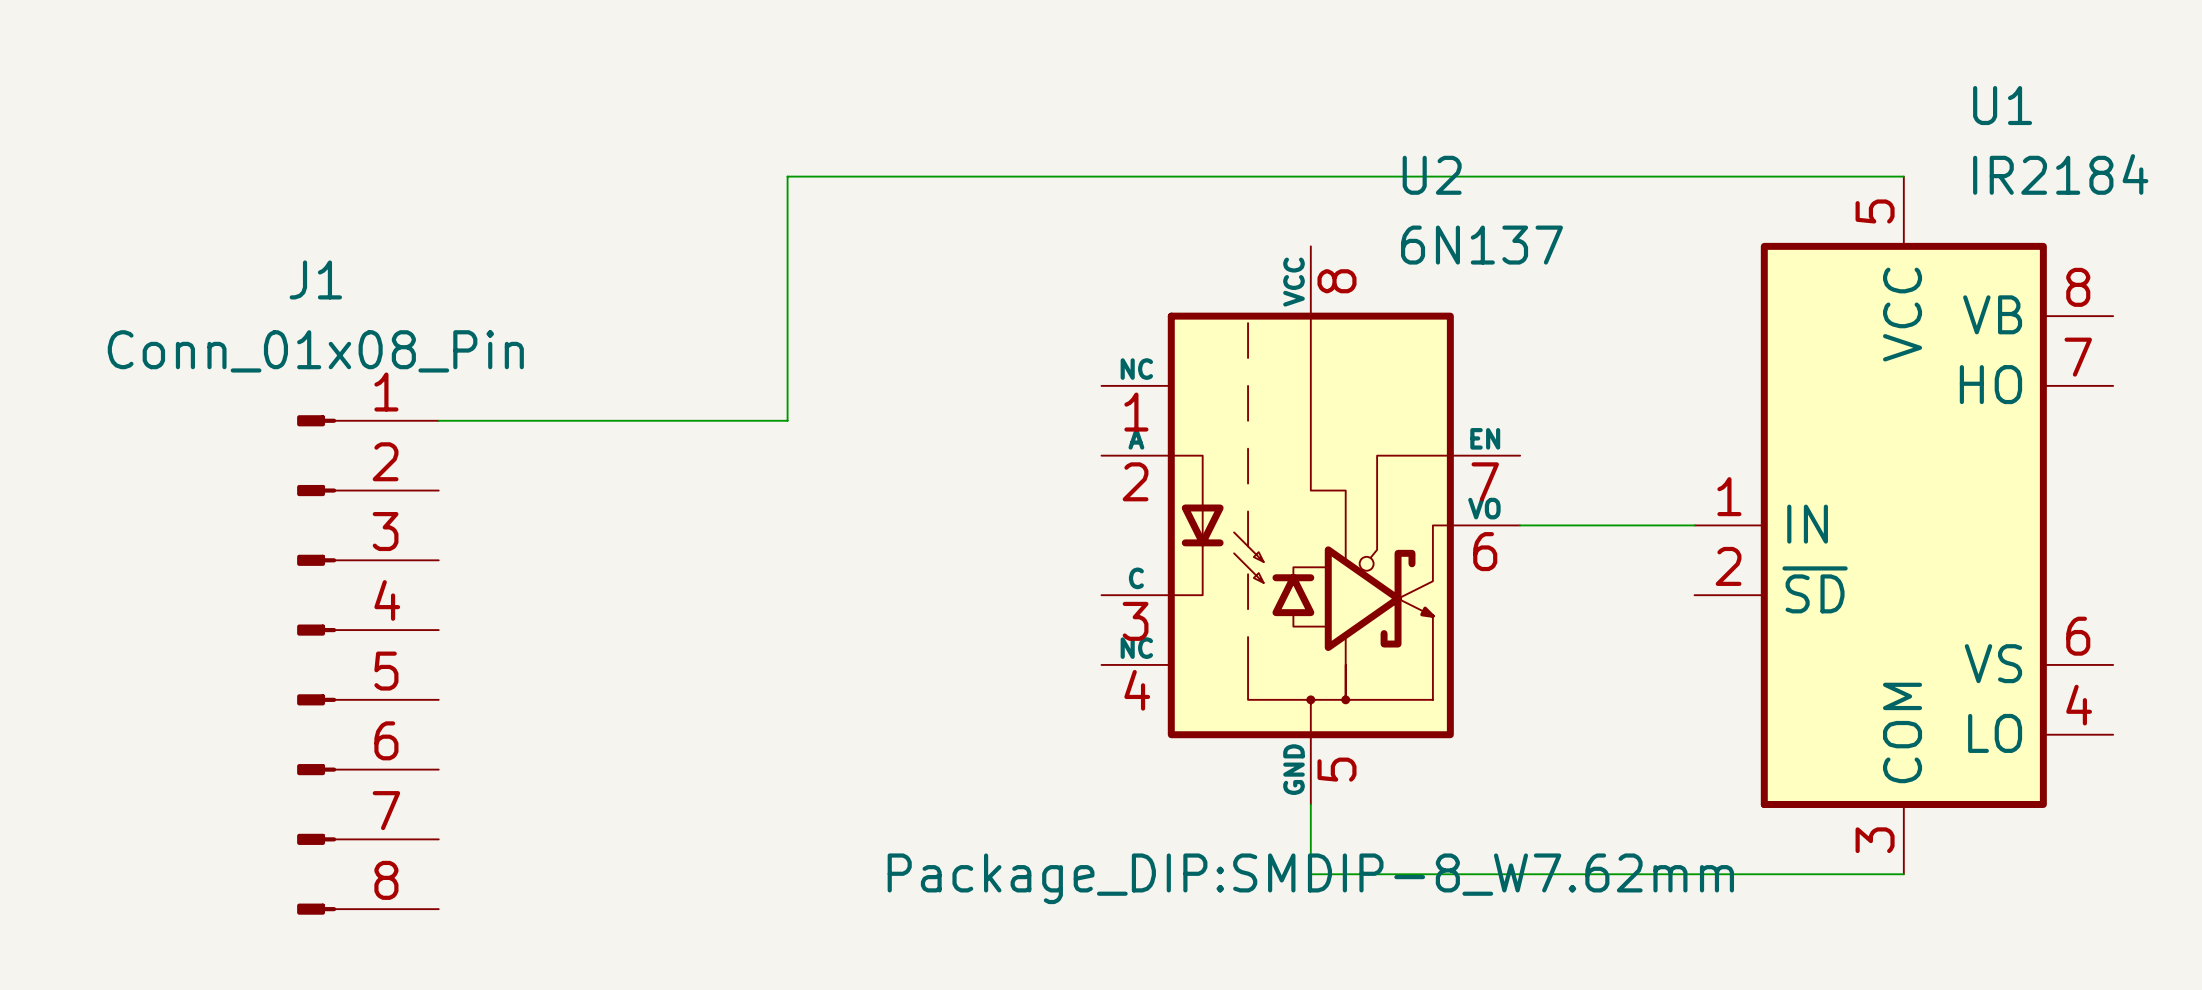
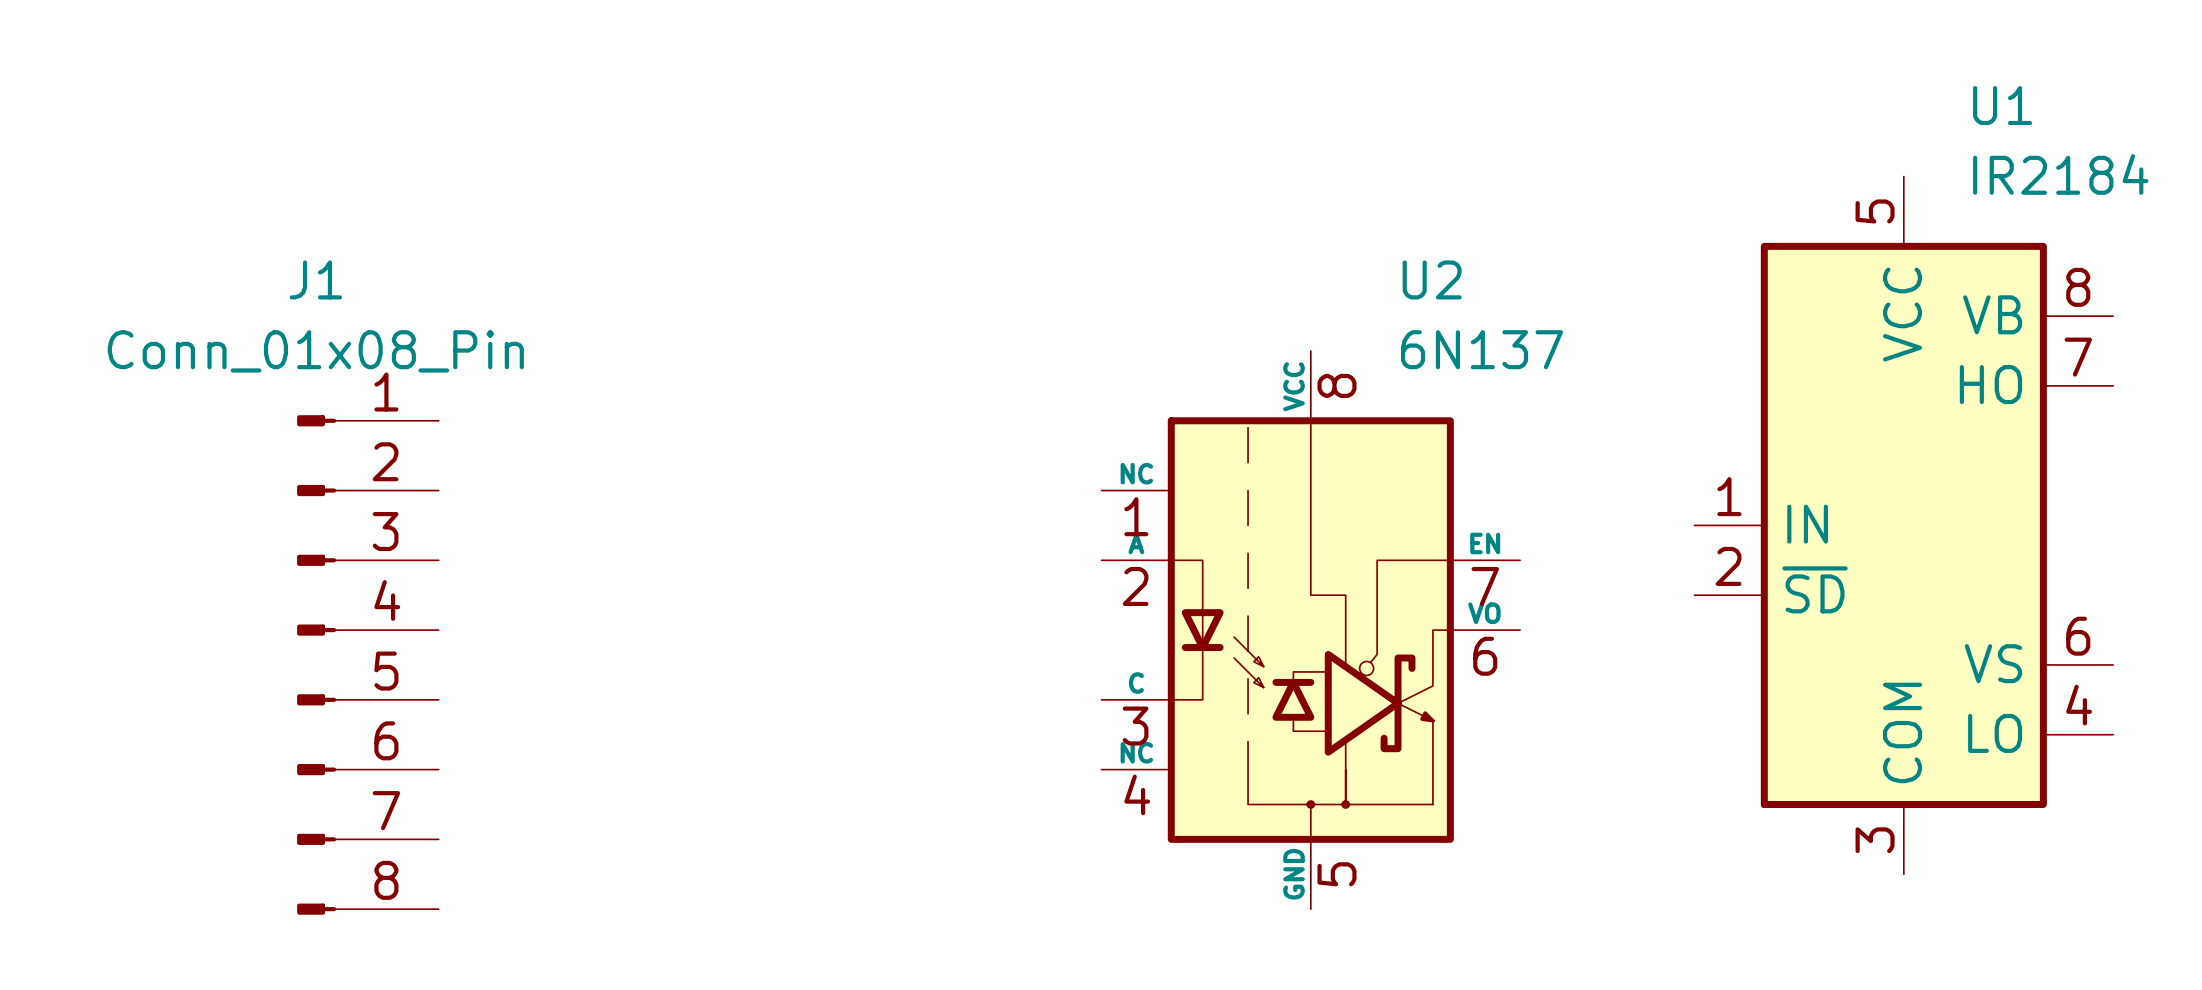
wire: (1903, 176) (787, 176) (787, 420) (438, 420) -> none
U2 position: (1310, 525) -> (1310, 630)
wire: (1520, 525) (1694, 525) -> none
wire: (1310, 804) (1310, 874) (1903, 874) -> none
U2 text: Package_DIP:SMDIP-8_W7.62mm (1310, 878) -> none

